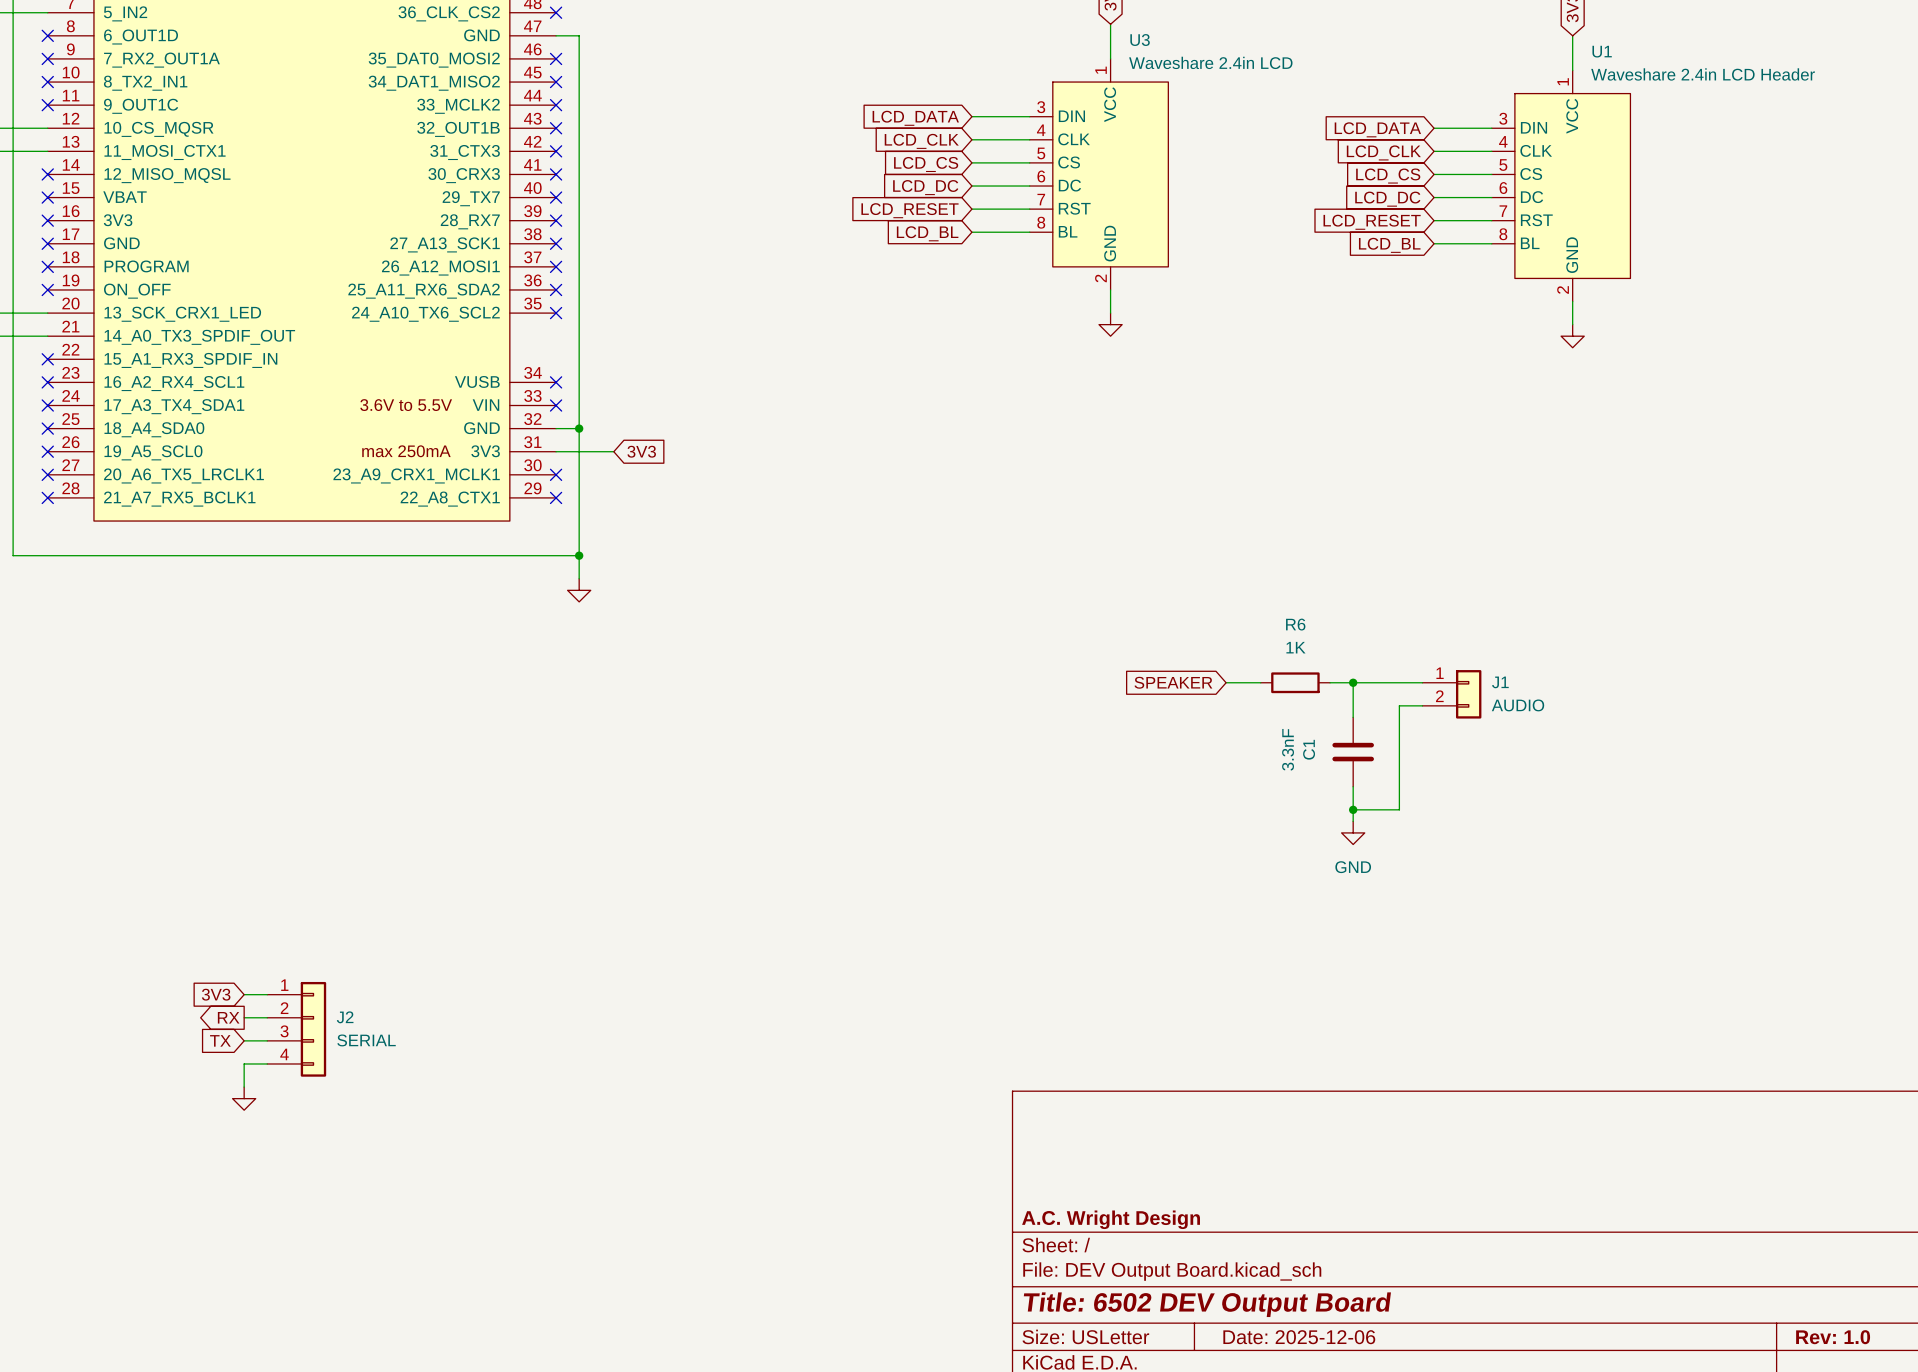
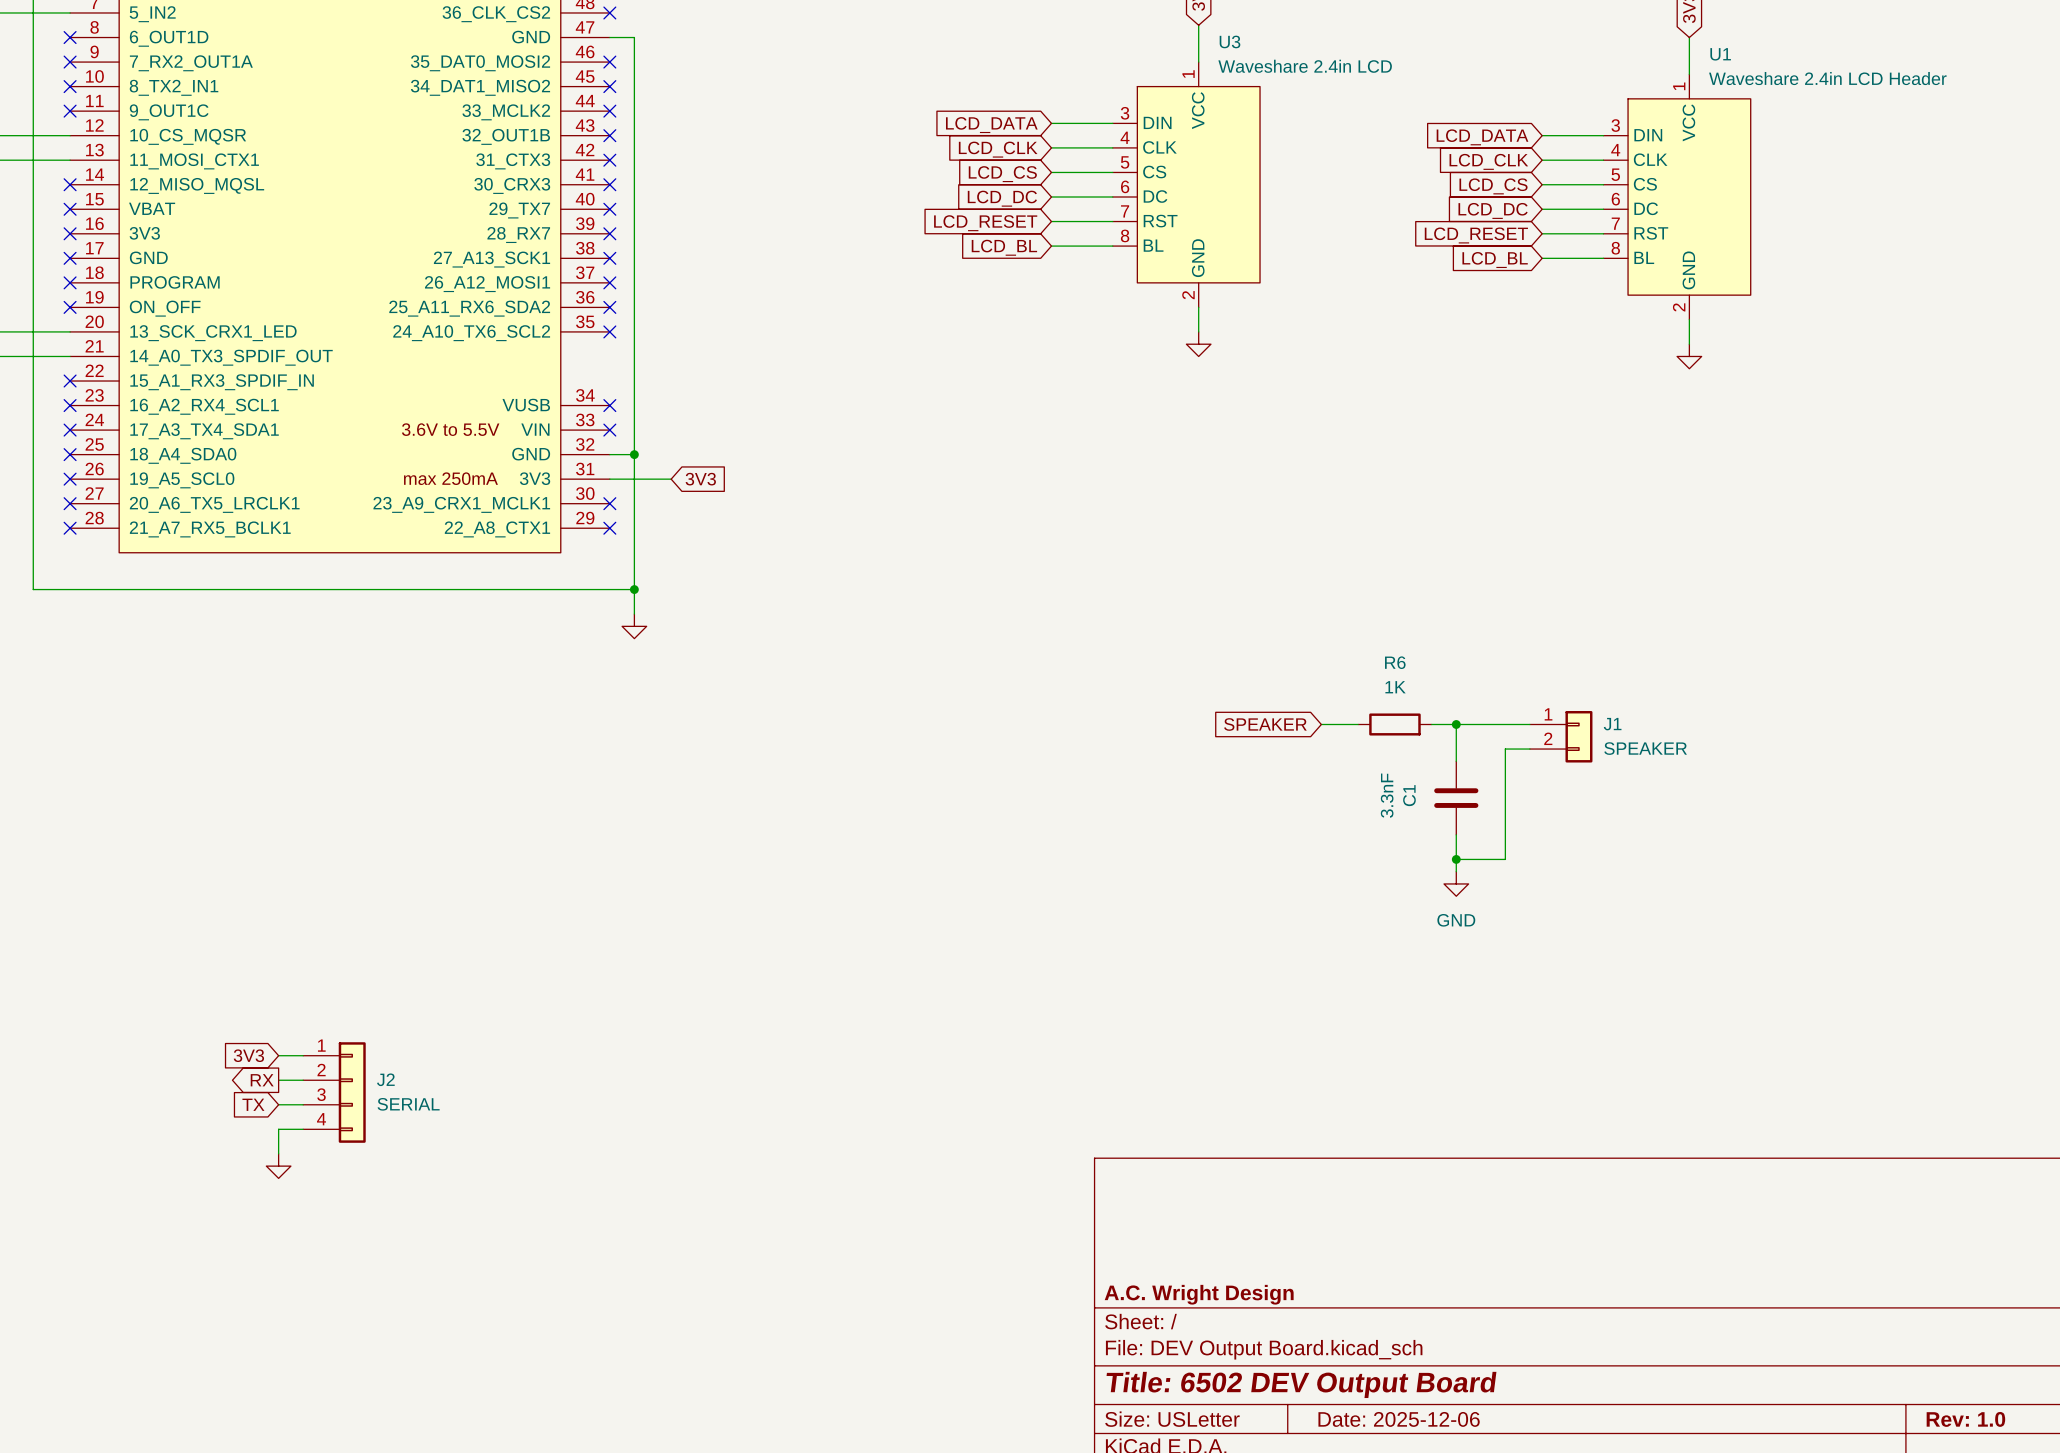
J1 value: AUDIO (1518, 705) -> SPEAKER (1645, 748)

